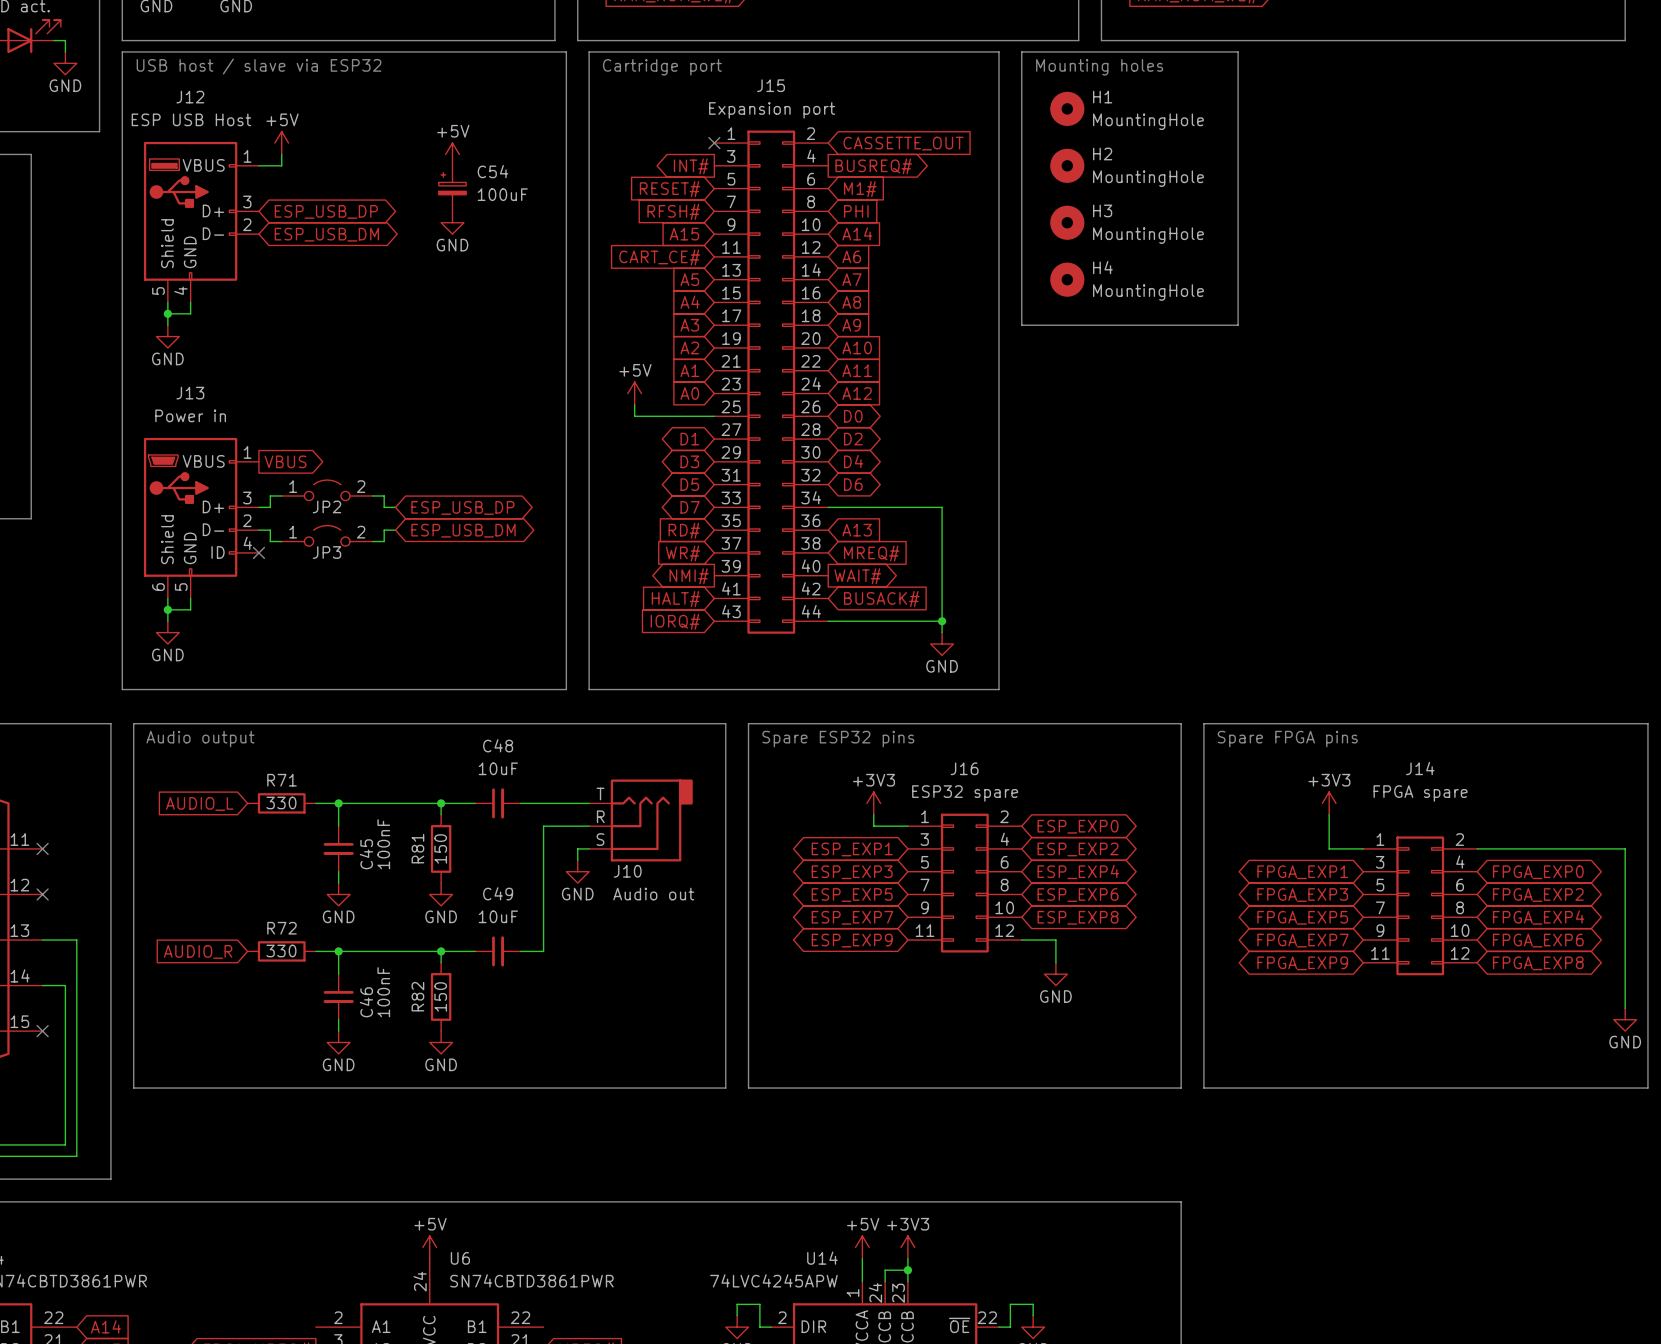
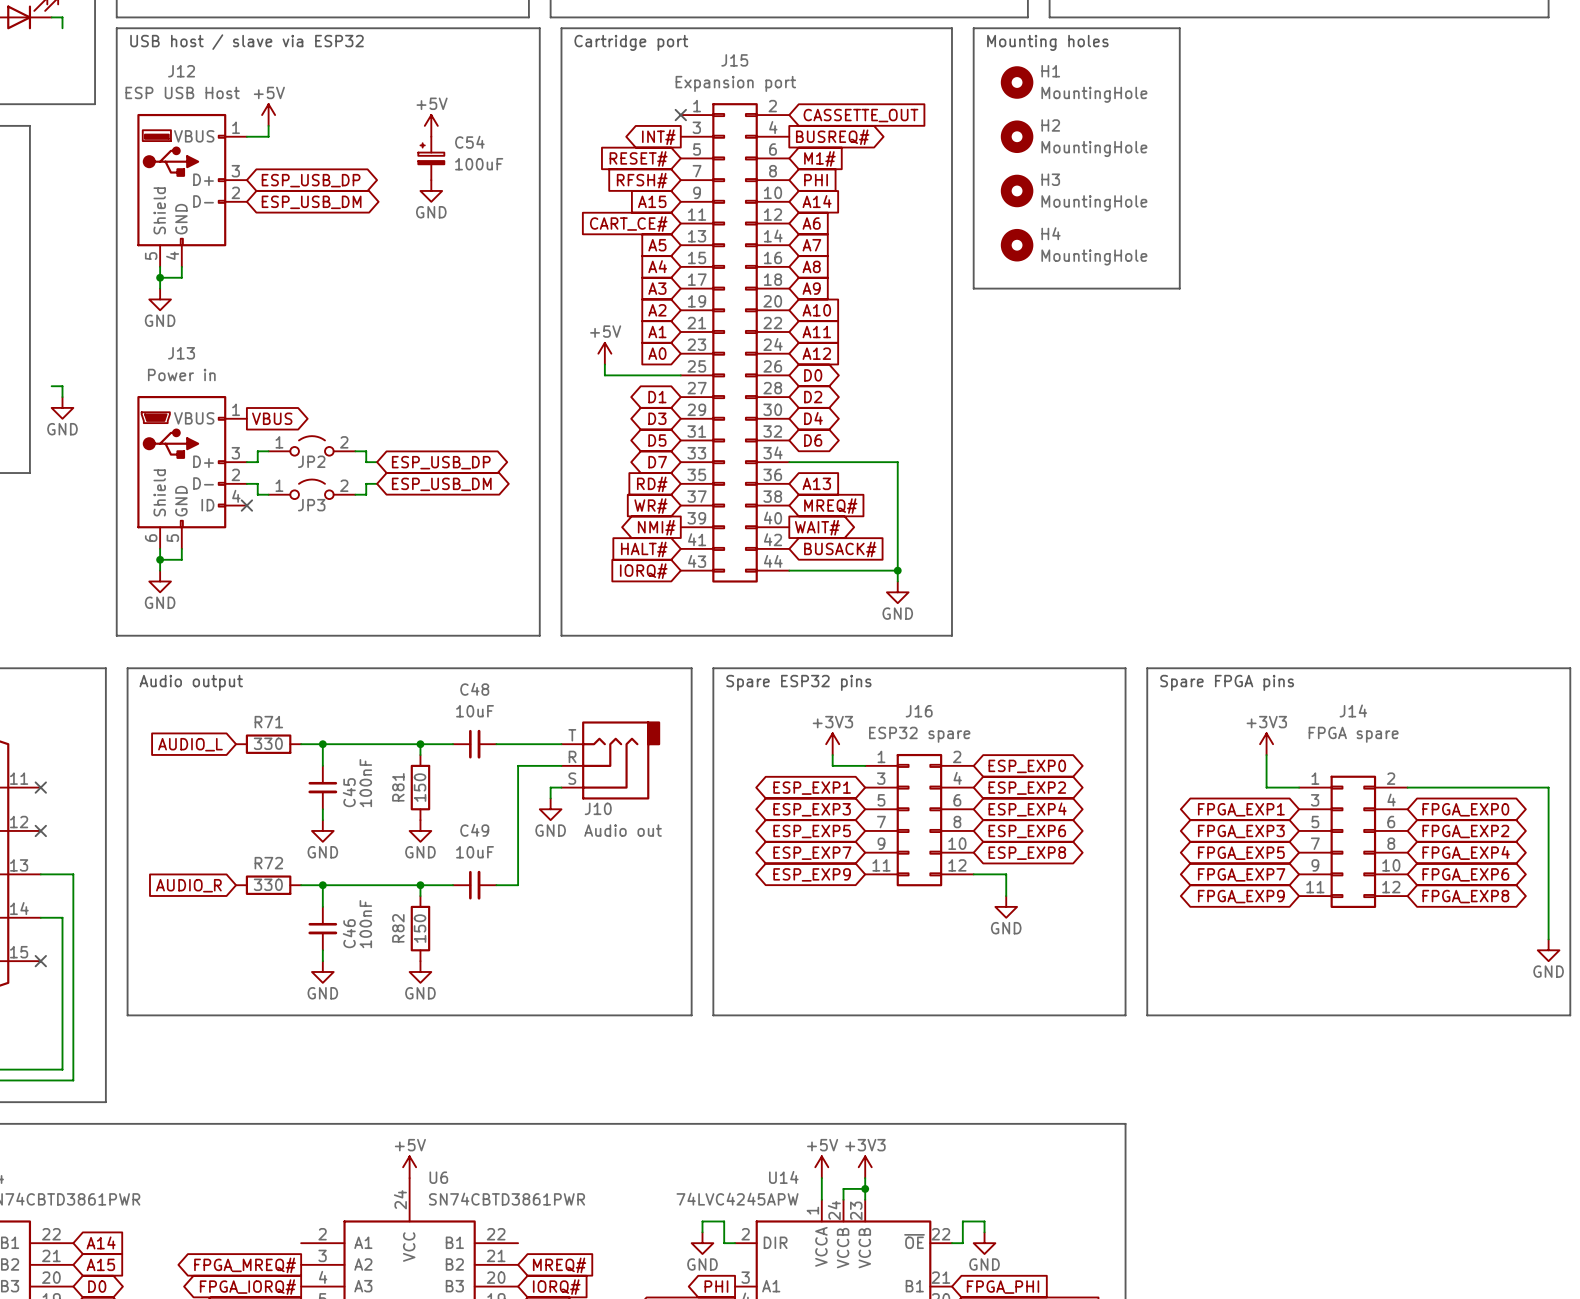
power symbol: GND (65, 63) -> none
wire: none -> (51, 386) (62, 386) (62, 397)
power symbol: none -> GND (62, 407)

